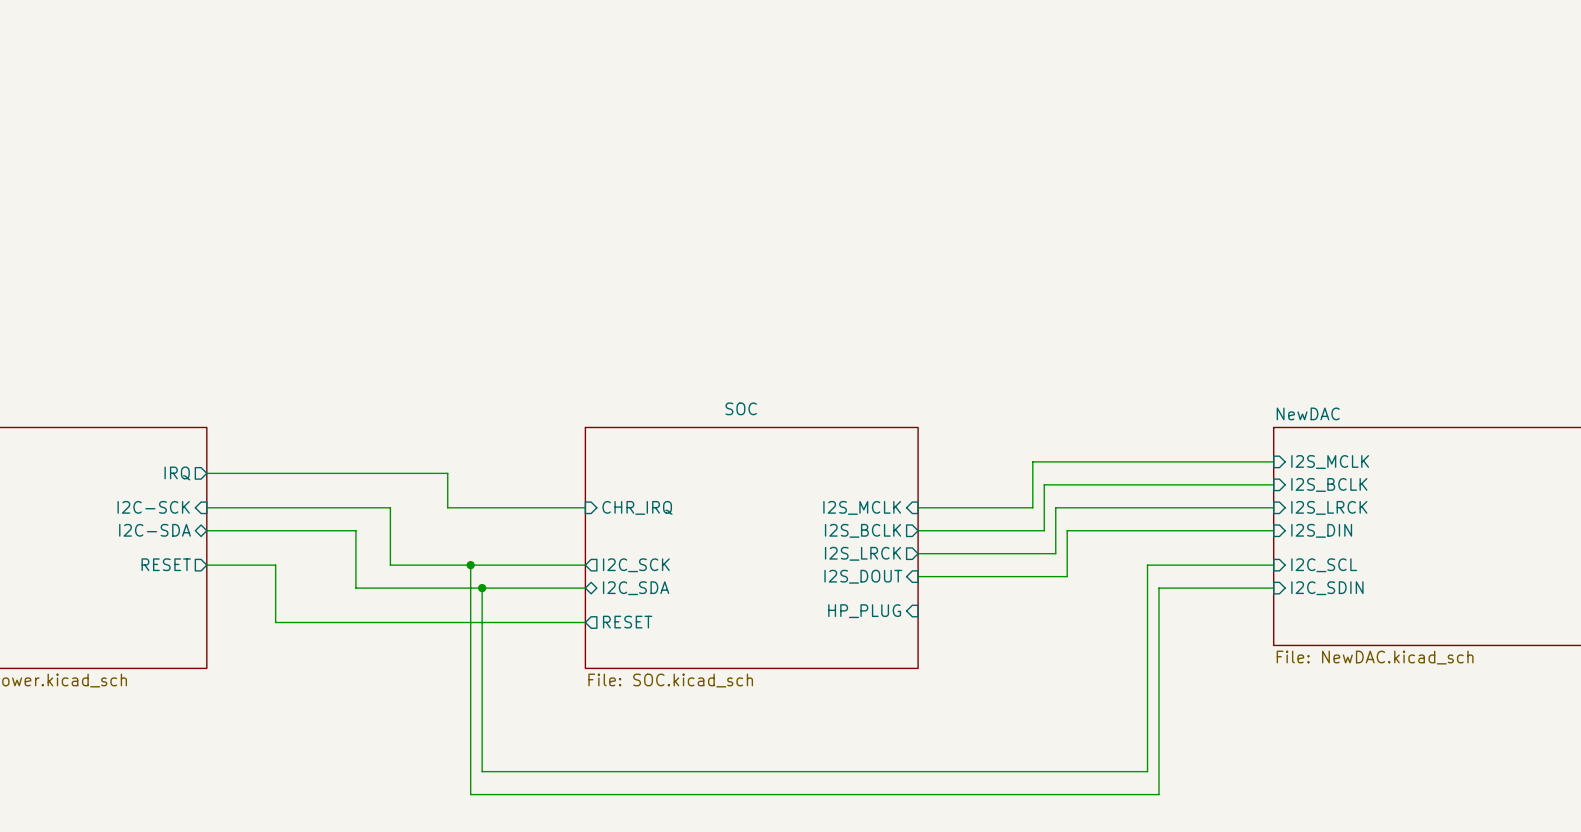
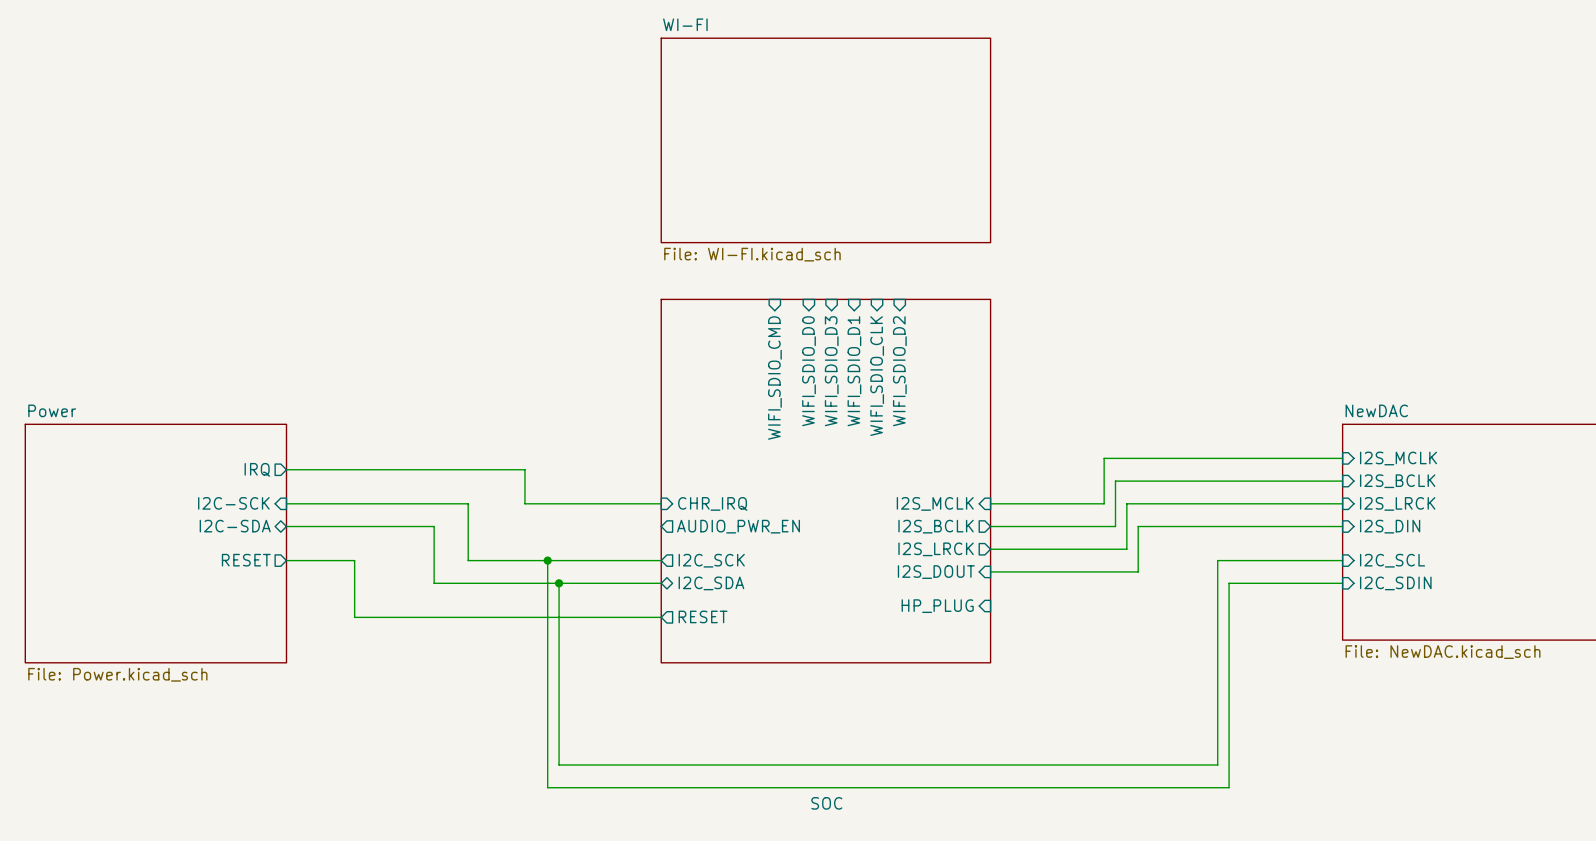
sheet WI-FI: none -> File: WI-FI.kicad_sch (825, 140)
sheet pin: none -> WIFI_SDIO_D0 (808, 371)
sheet pin: none -> WIFI_SDIO_D3 (831, 371)
sheet pin: none -> WIFI_SDIO_D1 (854, 371)
sheet pin: none -> WIFI_SDIO_D2 (899, 371)
sheet pin: none -> WIFI_SDIO_CLK (877, 376)
sheet pin: none -> WIFI_SDIO_CMD (774, 377)
sheet SOC: none -> (825, 481)
sheet pin: none -> AUDIO_PWR_EN (738, 526)
sheet SOC: File: SOC.kicad_sch (751, 547) -> none

